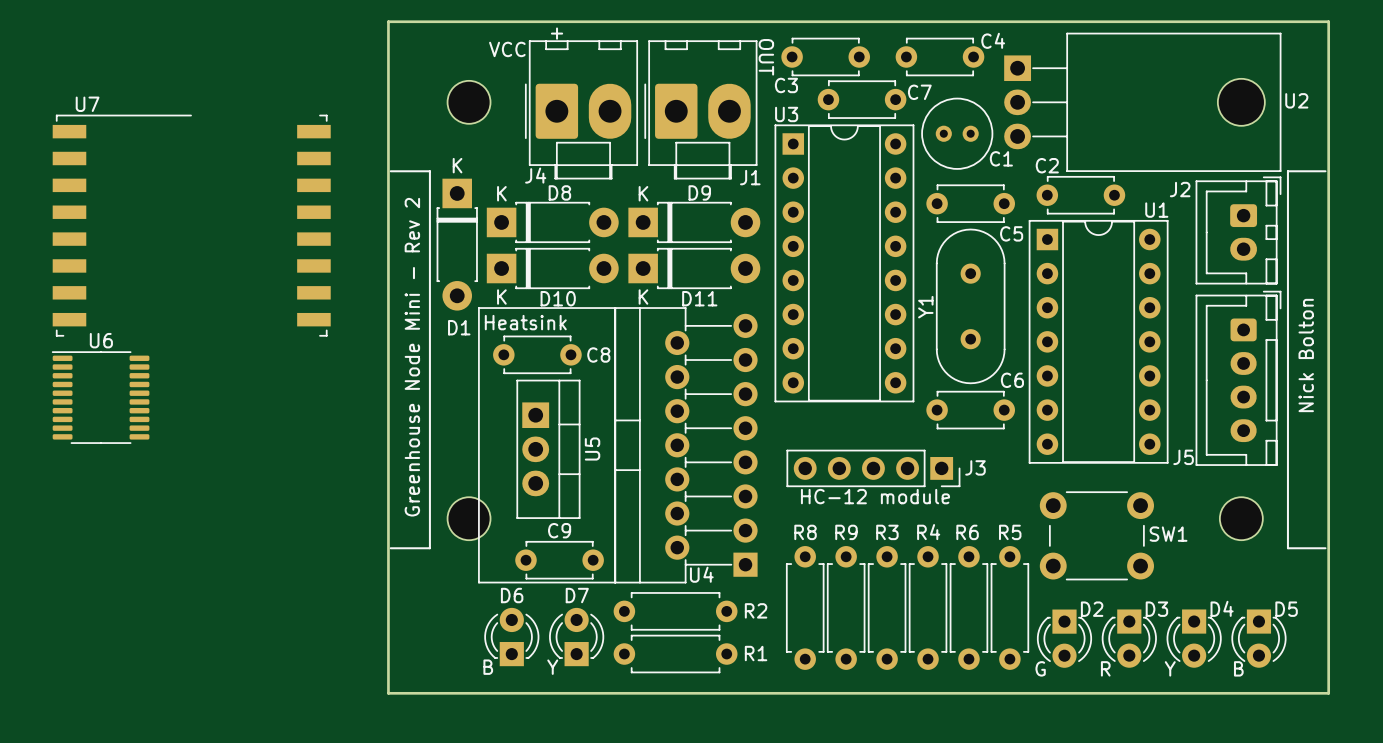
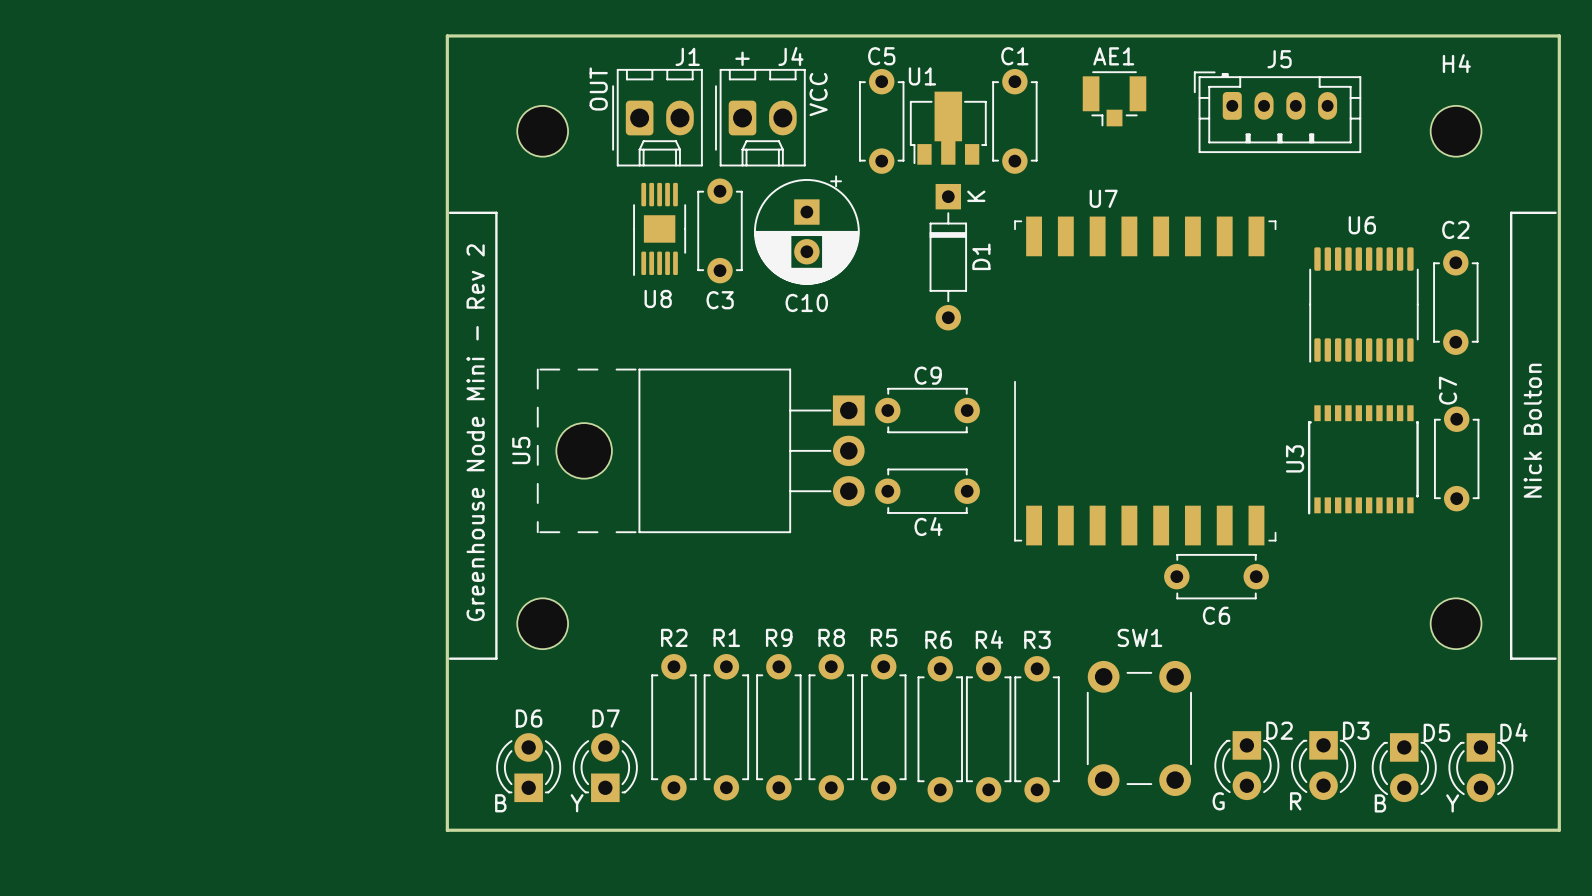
text position: + (557, 33) -> + (742, 58)
J4 footprint: [525, 40, 638, 180] -> [715, 68, 806, 167]
J1 footprint: [644, 40, 758, 180] -> [612, 68, 703, 167]
C4 name position: C4 (993, 40) -> C4 (928, 526)
text rotation: 0° (507, 49) -> 90° counterclockwise (818, 94)
text position: VCC (507, 49) -> VCC (818, 94)
C3 rotation: 0° (825, 56) -> 90° clockwise (720, 230)
C3 position: (825, 56) -> (720, 230)
C4 position: (939, 56) -> (927, 410)
text rotation: 0° (766, 57) -> 180° (598, 88)
text position: OUT (766, 57) -> OUT (598, 88)
AE1: none -> (1114, 98)
C3 name position: C3 (786, 85) -> C3 (720, 300)
C7 name position: C7 (919, 92) -> C7 (1448, 390)
C1 footprint: [921, 97, 994, 170] -> [992, 68, 1038, 174]
C7 rotation: 0° (862, 99) -> 90° clockwise (1456, 458)
C7 position: (862, 99) -> (1456, 458)
U2: (1142, 102) -> none
H4: none -> (1456, 131)
U7 name position: U7 (87, 104) -> U7 (1103, 198)
U3 name position: U3 (786, 114) -> U3 (1295, 458)
U3 footprint: [774, 124, 915, 403] -> [1307, 405, 1419, 515]
C1 name position: C1 (1001, 158) -> C1 (1014, 56)
C2 name position: C2 (1047, 165) -> C2 (1455, 229)
J4 name position: J4 (535, 175) -> J4 (790, 56)
J1 name position: J1 (750, 177) -> J1 (687, 56)
D1 footprint: [436, 178, 478, 311] -> [929, 183, 968, 331]
U8: none -> (659, 229)
C10: none -> (806, 230)
C2 rotation: 0° (1080, 195) -> 90° clockwise (1455, 302)
C2 position: (1080, 195) -> (1455, 302)
C5 rotation: 0° (970, 203) -> 90° clockwise (881, 121)
C5 position: (970, 203) -> (881, 121)
U1 name position: U1 (1156, 210) -> U1 (922, 76)
U1 footprint: [1028, 220, 1169, 464] -> [909, 91, 987, 165]
D8: (552, 222) -> none
D9: (694, 222) -> none
U7 rotation: 0° (191, 225) -> 90° counterclockwise (1145, 380)
U7 position: (191, 225) -> (1145, 380)
J2: (1238, 230) -> none
C5 name position: C5 (1011, 233) -> C5 (881, 56)
D10: (552, 268) -> none
D11: (694, 268) -> none
J5 footprint: [1195, 290, 1282, 466] -> [1193, 71, 1362, 154]
Y1: (970, 306) -> none
line: (478, 308) (615, 308) (615, 582) (478, 582) (478, 308) -> none
text: Heatsink (525, 322) -> none
D1 name position: D1 (459, 327) -> D1 (981, 256)
C8: (537, 354) -> none
U5 footprint: [516, 379, 581, 519] -> [536, 368, 865, 534]
C6 name position: C6 (1012, 380) -> C6 (1216, 615)
U6 rotation: 0° (100, 397) -> 90° counterclockwise (1363, 305)
U6 position: (100, 397) -> (1363, 305)
C6 position: (970, 410) -> (1216, 576)
U4: (686, 445) -> none
U5 name position: U5 (592, 449) -> U5 (521, 450)
J5 name position: J5 (1183, 457) -> J5 (1279, 59)
J3: (873, 468) -> none
text: HC-12 module (875, 496) -> none
C9 name position: C9 (559, 530) -> C9 (928, 375)
R8 name: R8 (805, 532) -> R6 (938, 639)
R9 name: R9 (846, 532) -> R4 (989, 639)
SW1 name position: SW1 (1168, 534) -> SW1 (1139, 637)
SW1 rotation: 0° (1096, 535) -> 90° clockwise (1139, 728)
SW1 position: (1096, 535) -> (1139, 728)
C9 position: (559, 560) -> (927, 491)
R9: none -> (778, 727)
R8: none -> (831, 727)
R4: (928, 607) -> none
R6: (968, 607) -> none
R5 position: (1009, 607) -> (883, 727)
R2 name position: R2 (756, 610) -> R2 (674, 637)
R2 rotation: 0° (675, 611) -> 90° clockwise (673, 727)
R2 position: (675, 611) -> (673, 727)
D6 position: (511, 637) -> (528, 767)
D7 position: (576, 637) -> (605, 767)
D4 position: (1194, 638) -> (1480, 767)
D5 position: (1258, 638) -> (1404, 767)
R1 name position: R1 (756, 653) -> R1 (726, 637)
R1 rotation: 0° (675, 654) -> 90° clockwise (726, 727)

